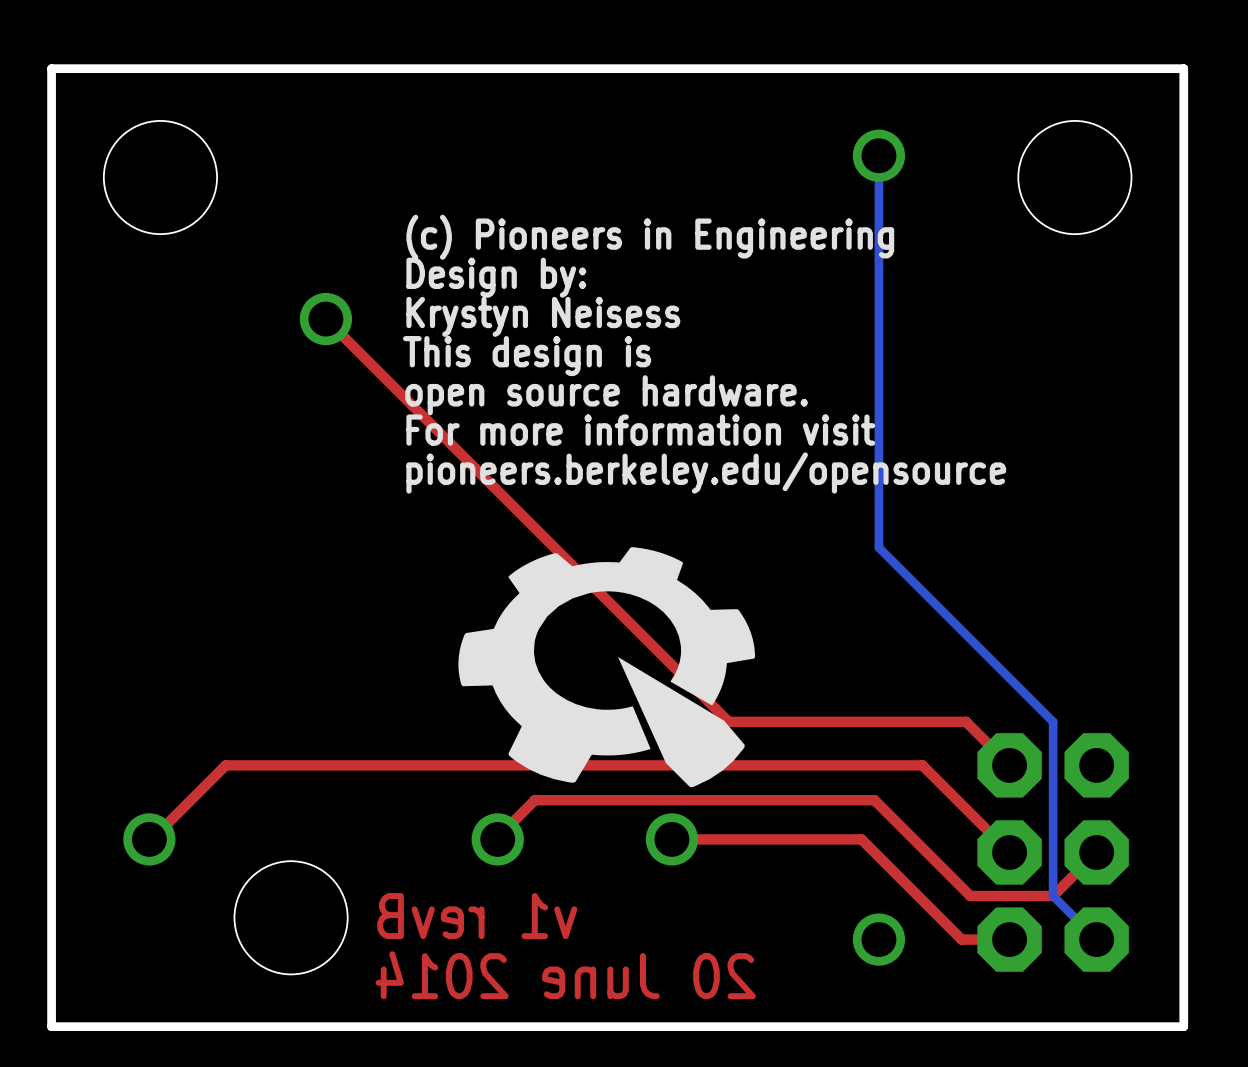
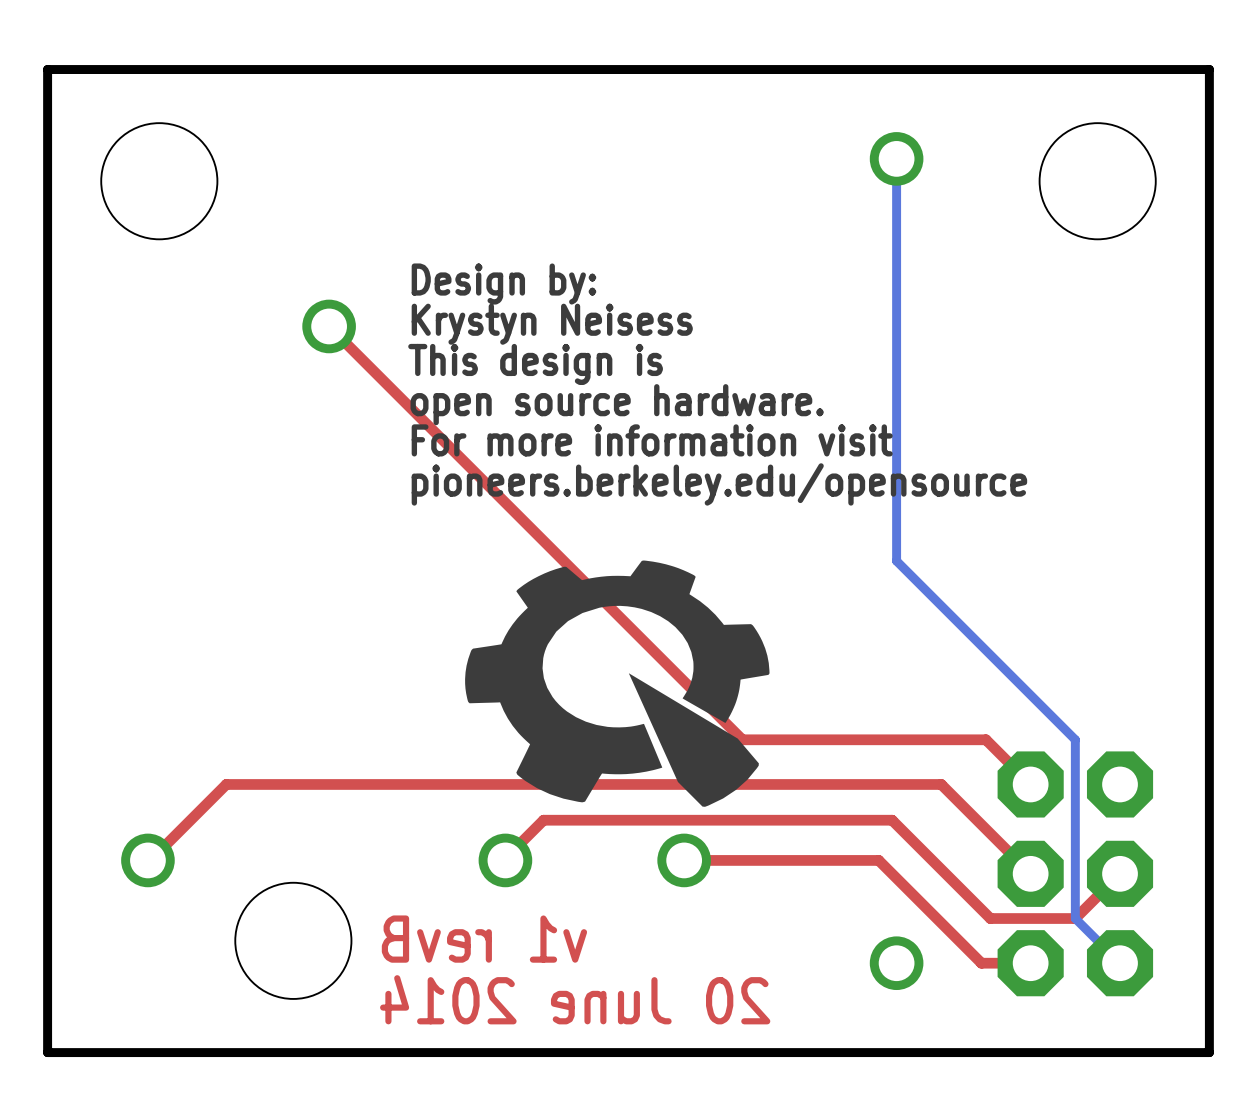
text: (c) Pioneers in Engineering (650, 237) -> none

